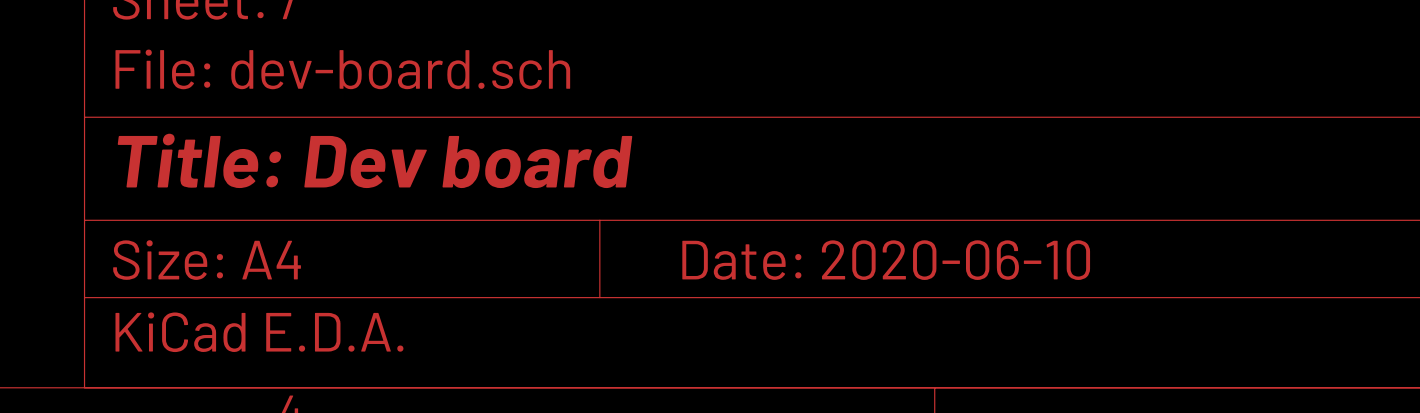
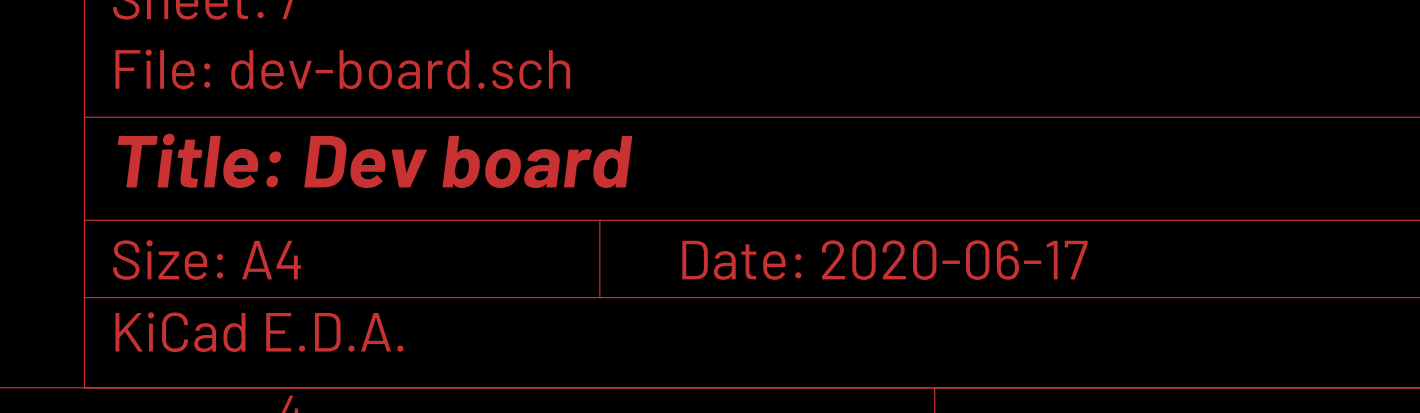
title block: Date: 2020-06-10 (886, 260) -> Date: 2020-06-17 (885, 260)

